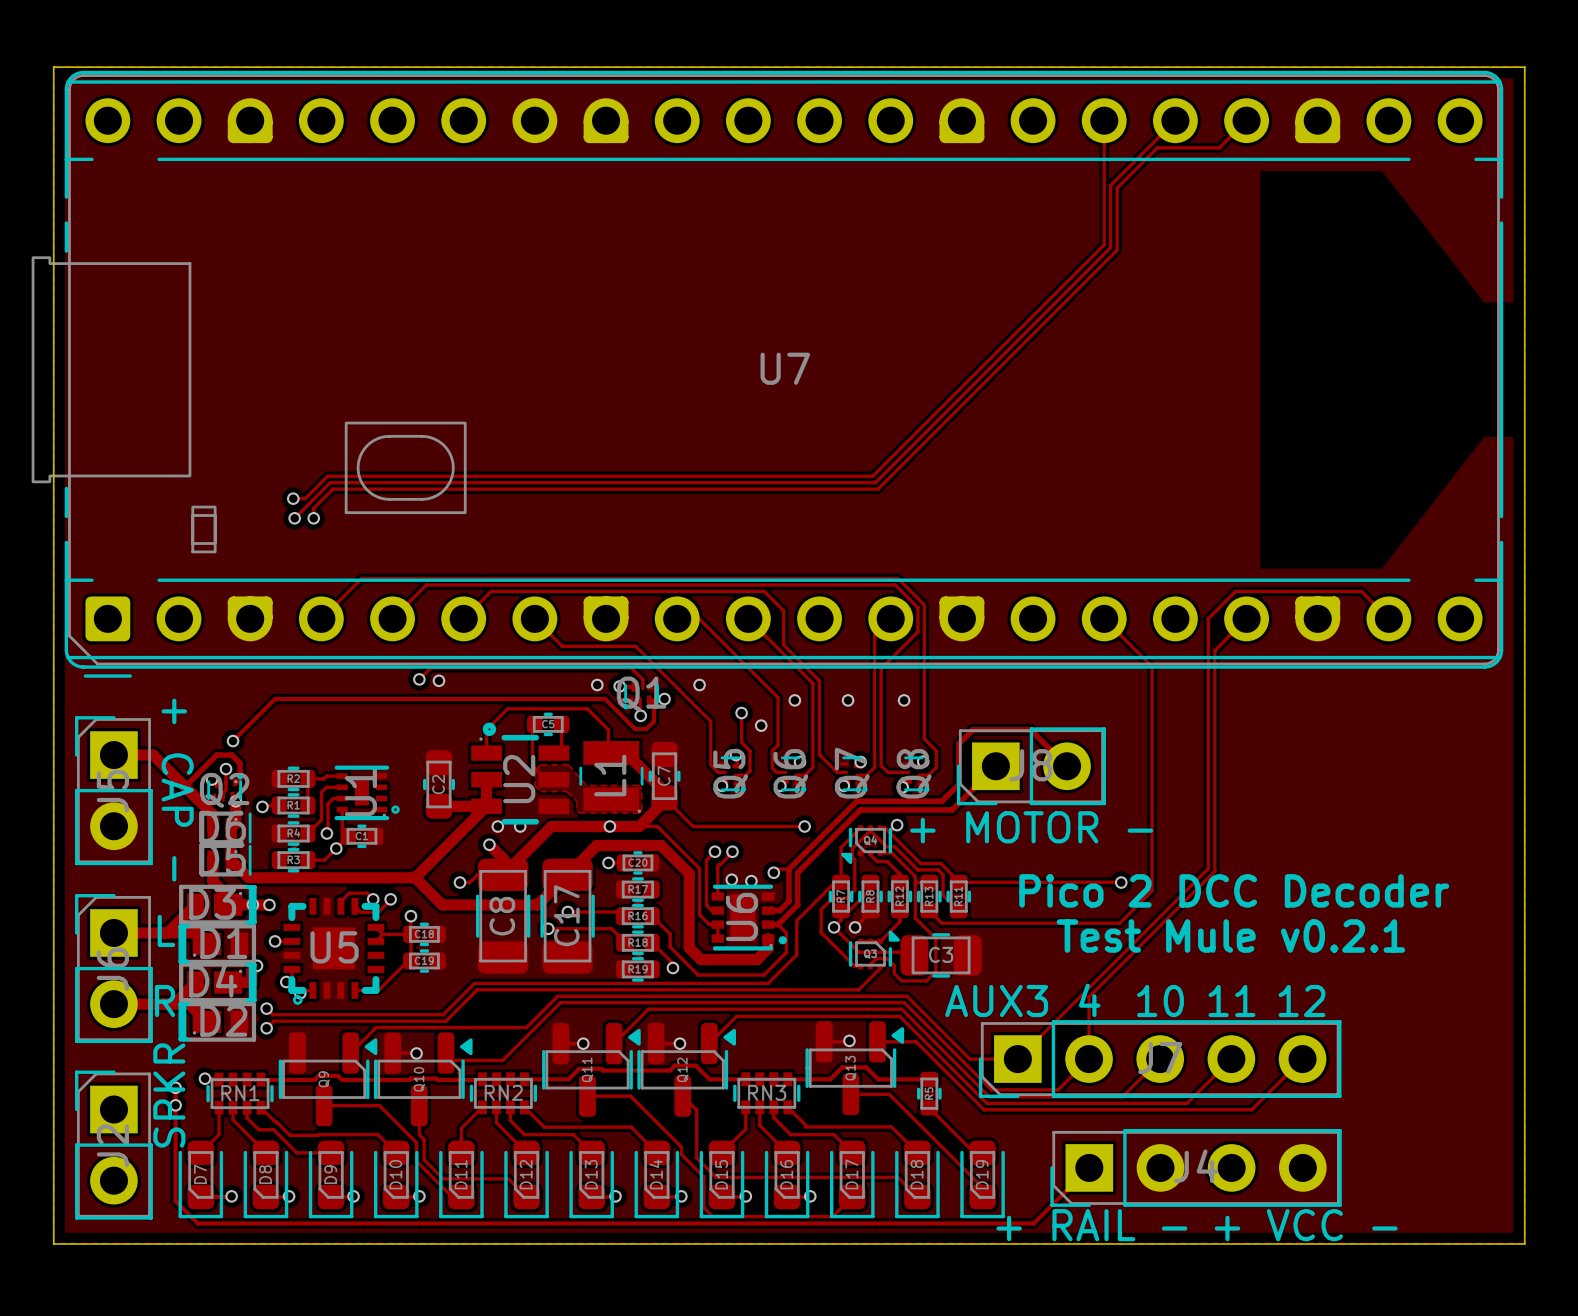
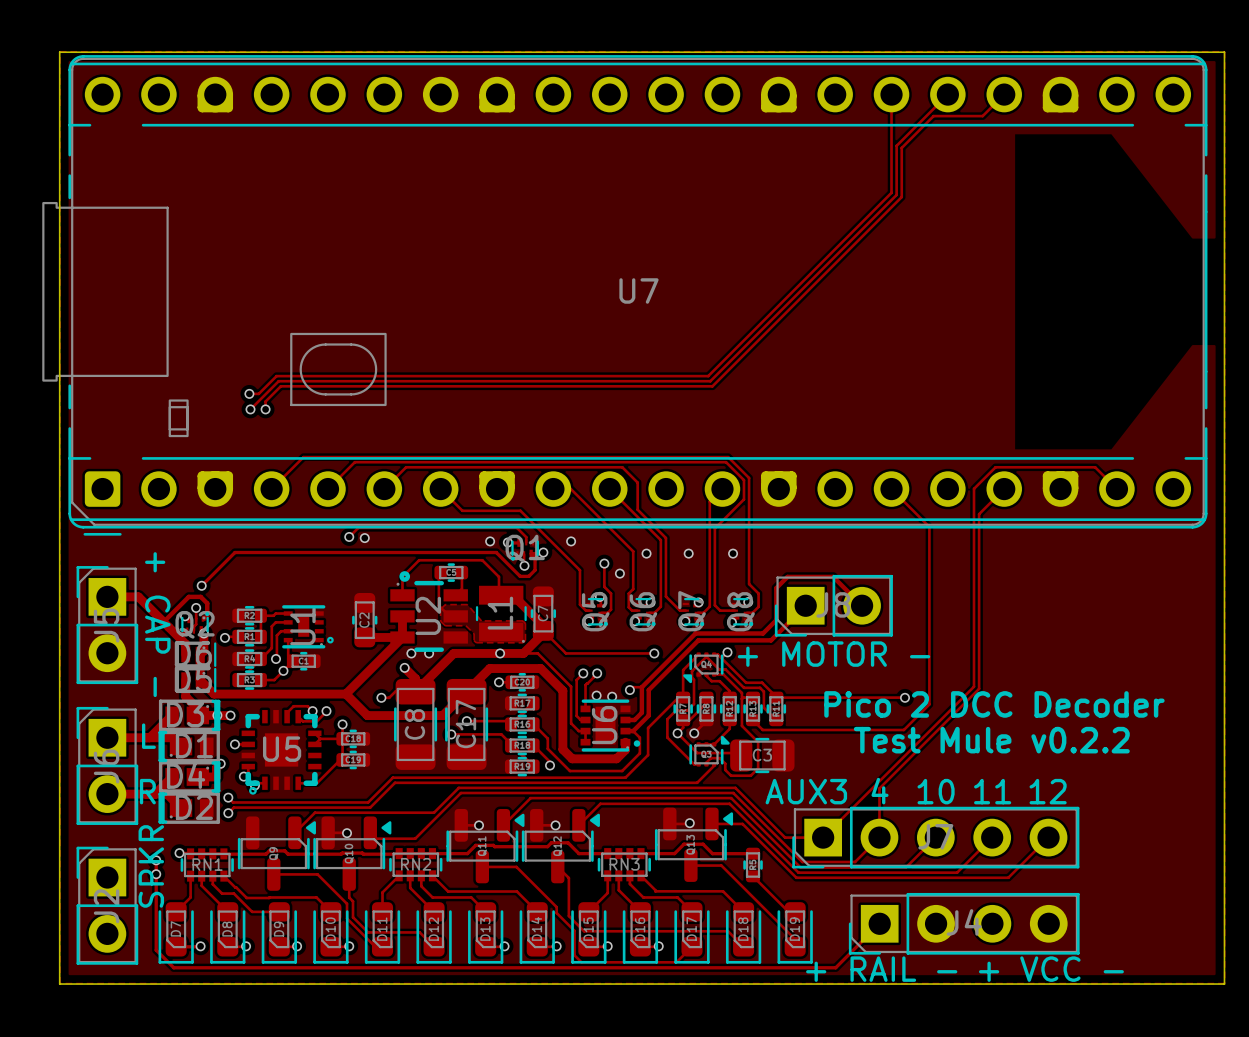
text: Test Mule v0.2.1 (1230, 936) -> Test Mule v0.2.2 (991, 740)

